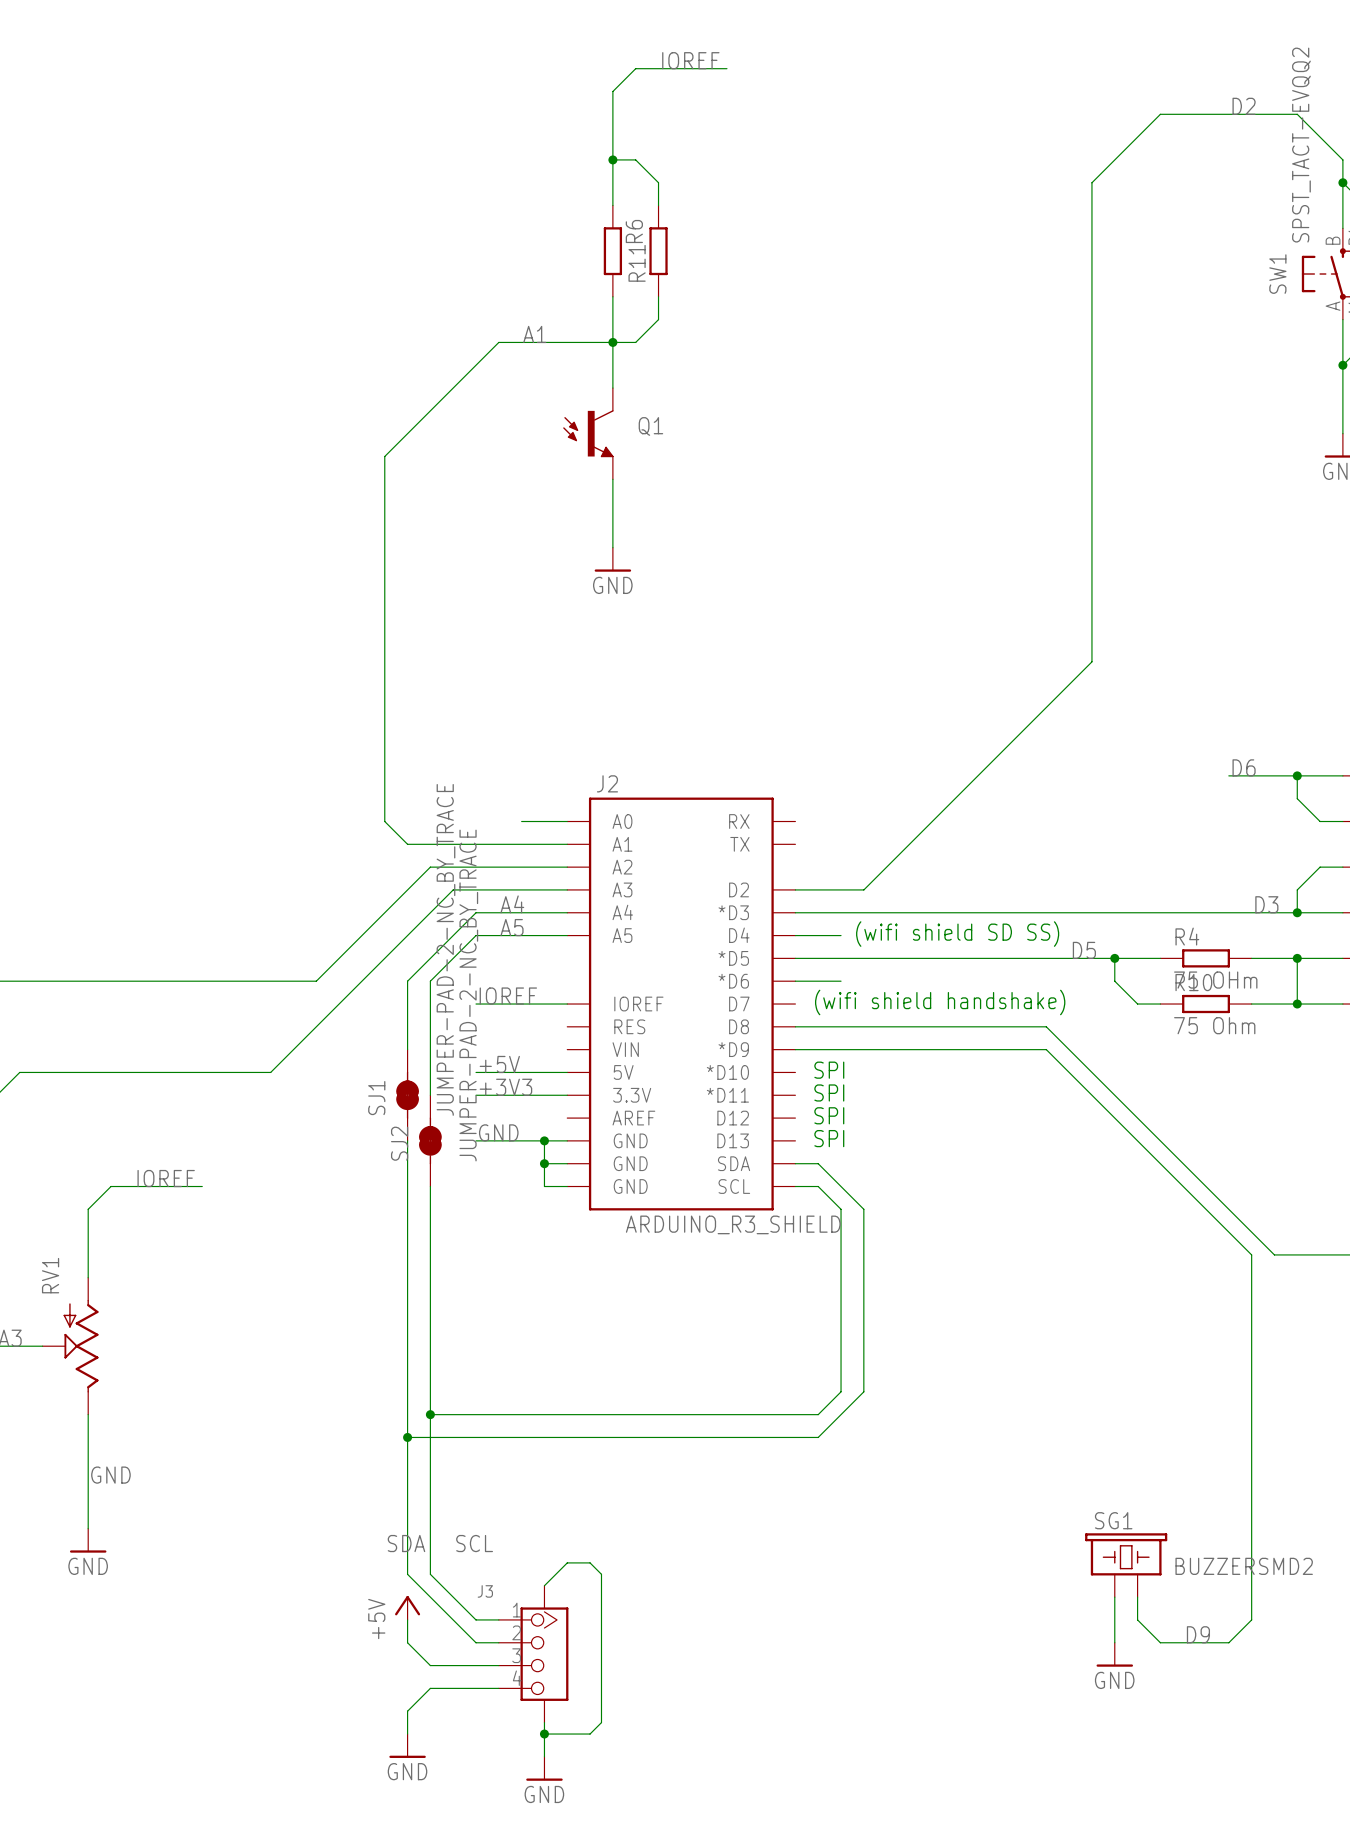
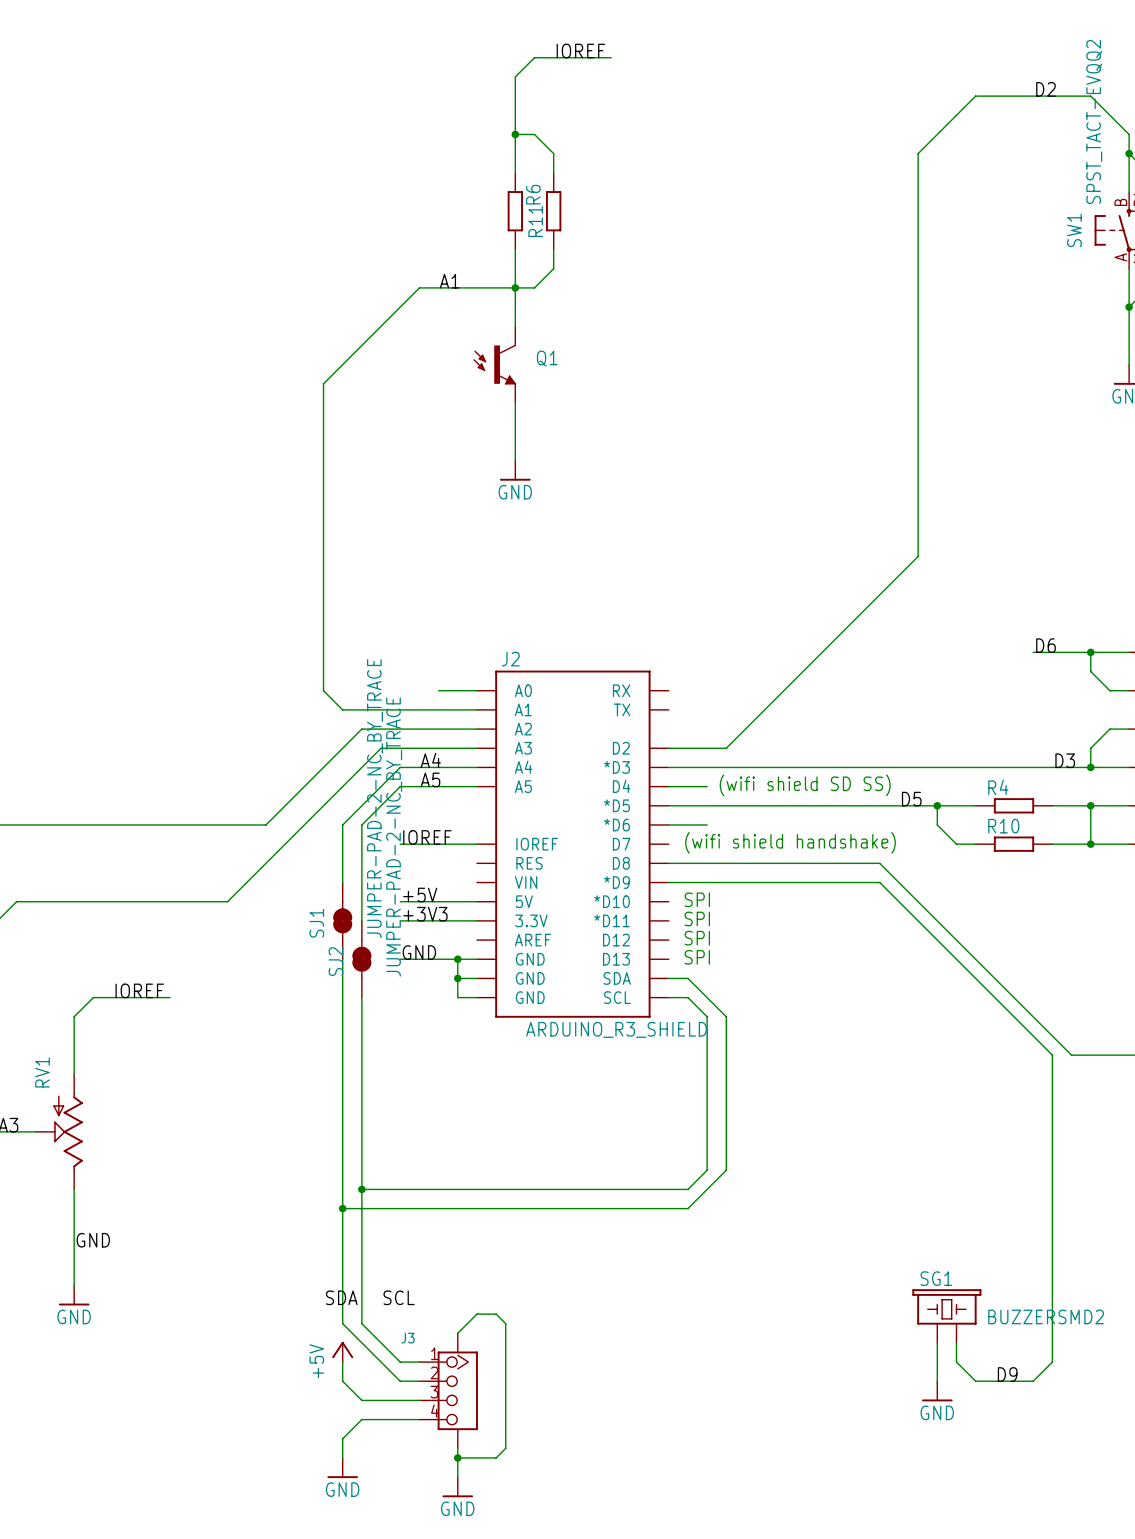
R4 value: 75 OHm (1215, 980) -> none
R10 value: 75 Ohm (1214, 1025) -> none

